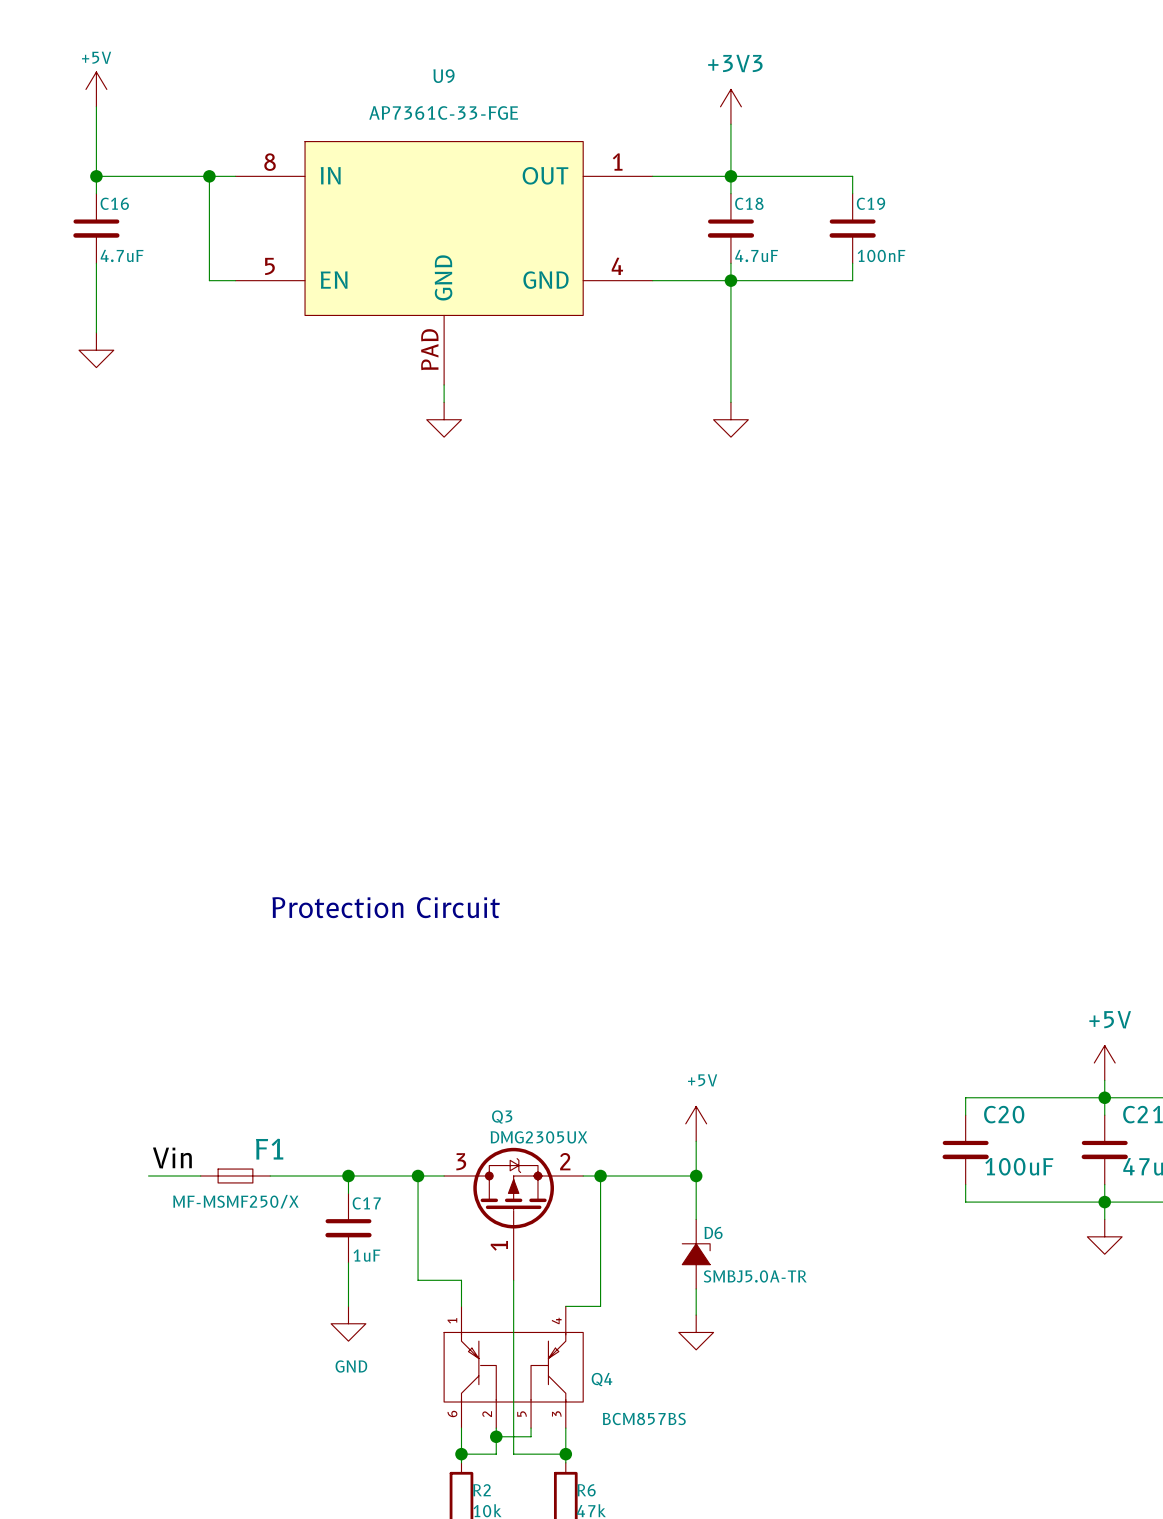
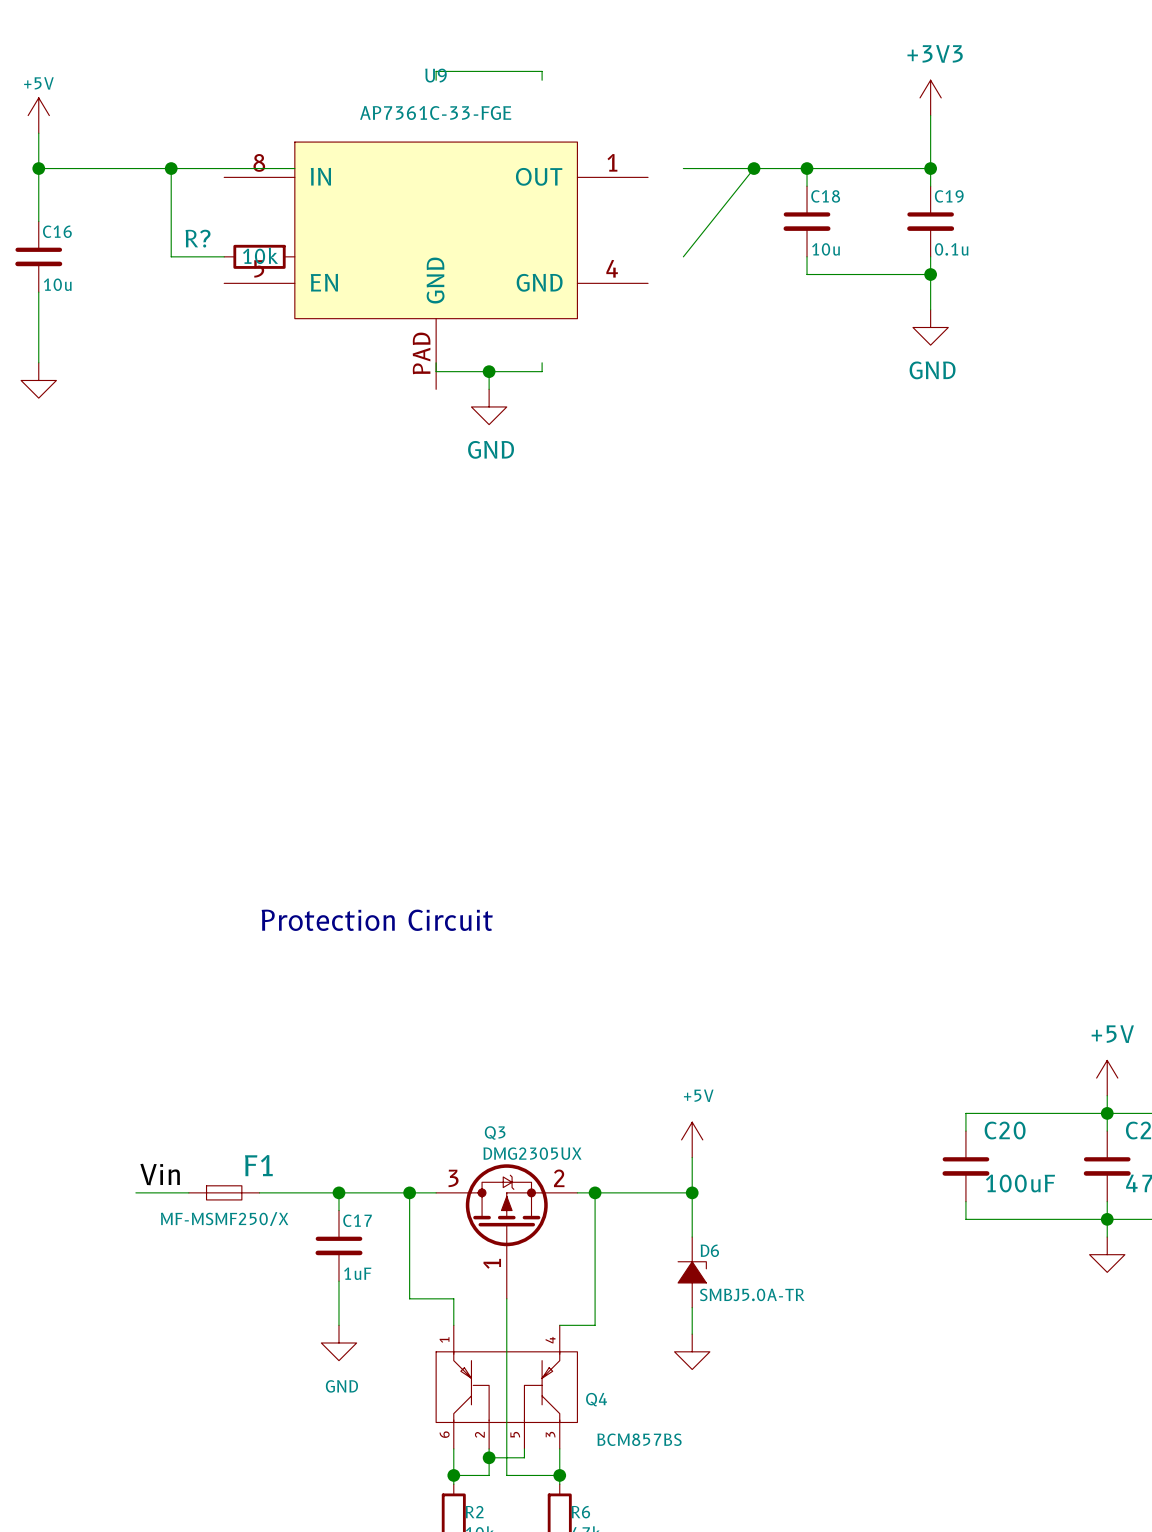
wire: none -> (436, 80) (436, 71) (542, 71) (542, 80)
power symbol position: +5V (96, 89) -> +5V (38, 115)
wire: (96, 106) (96, 193) -> (38, 133) (38, 221)
power symbol position: +3V3 (730, 106) -> +3V3 (930, 97)
wire: (730, 124) (730, 193) -> (930, 115) (930, 186)
wire: none -> (38, 168) (294, 168)
junction: none -> (38, 168)
wire: none -> (171, 168) (171, 256) (224, 256)
wire: none -> (683, 168) (930, 168)
wire: none -> (754, 168) (683, 256)
wire: none -> (807, 168) (807, 186)
junction: none -> (807, 168)
junction: none -> (930, 168)
wire: (96, 176) (235, 176) -> none
junction: (96, 176) -> none
wire: (209, 176) (209, 280) (235, 280) -> none
junction position: (209, 176) -> (171, 168)
wire: (652, 176) (852, 176) (852, 193) -> none
junction position: (730, 176) -> (754, 168)
C16 position: (96, 228) -> (38, 256)
C18 position: (730, 228) -> (807, 221)
C19 position: (852, 228) -> (930, 221)
R?: none -> 10k (259, 256)
wire: none -> (807, 256) (807, 274) (930, 274)
wire: none -> (930, 256) (930, 309)
C16 value: 4.7uF (122, 255) -> 10u (57, 284)
C18 value: 4.7uF (756, 255) -> 10u (825, 249)
C19 value: 100nF (881, 255) -> 0.1u (951, 249)
wire: (96, 263) (96, 332) -> (38, 292) (38, 362)
wire: (730, 263) (730, 402) -> none
wire: (852, 263) (852, 280) (652, 280) -> none
junction: none -> (930, 274)
junction: (730, 280) -> none
power symbol: none -> GND (930, 327)
power symbol position: (96, 350) -> (38, 380)
wire: none -> (436, 362) (436, 371) (542, 371) (542, 362)
junction: none -> (489, 371)
wire: (444, 384) (444, 402) -> (489, 371) (489, 389)
power symbol: none -> GND (489, 406)
power symbol: (444, 419) -> none
power symbol: (730, 419) -> none

